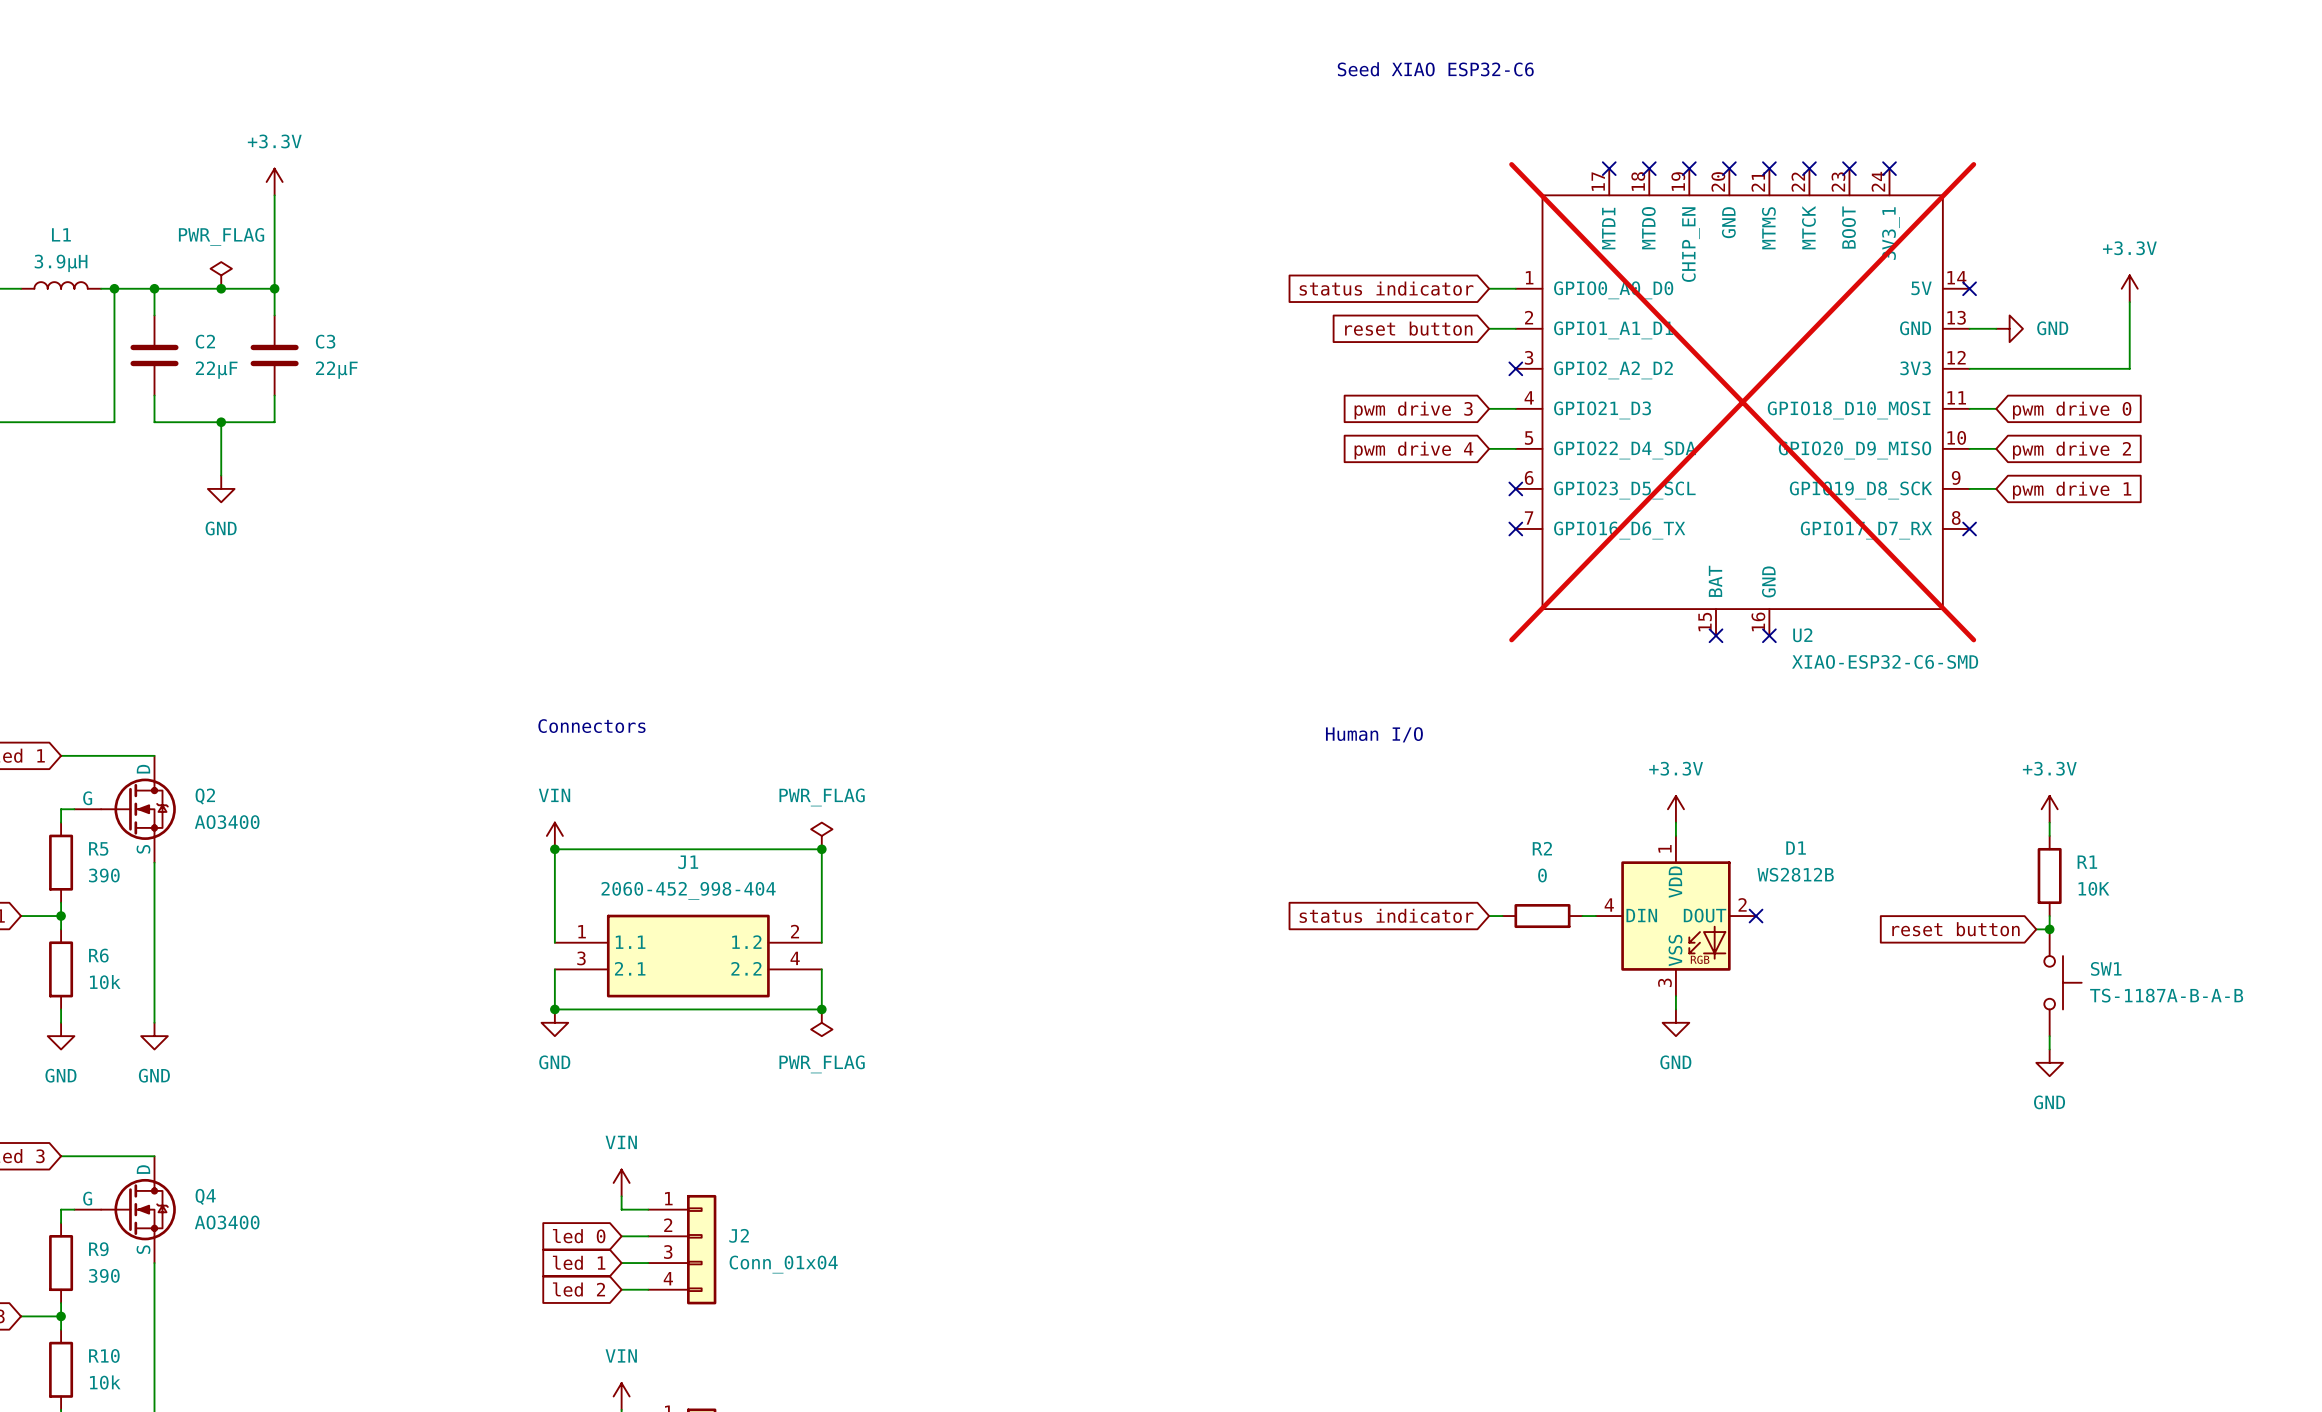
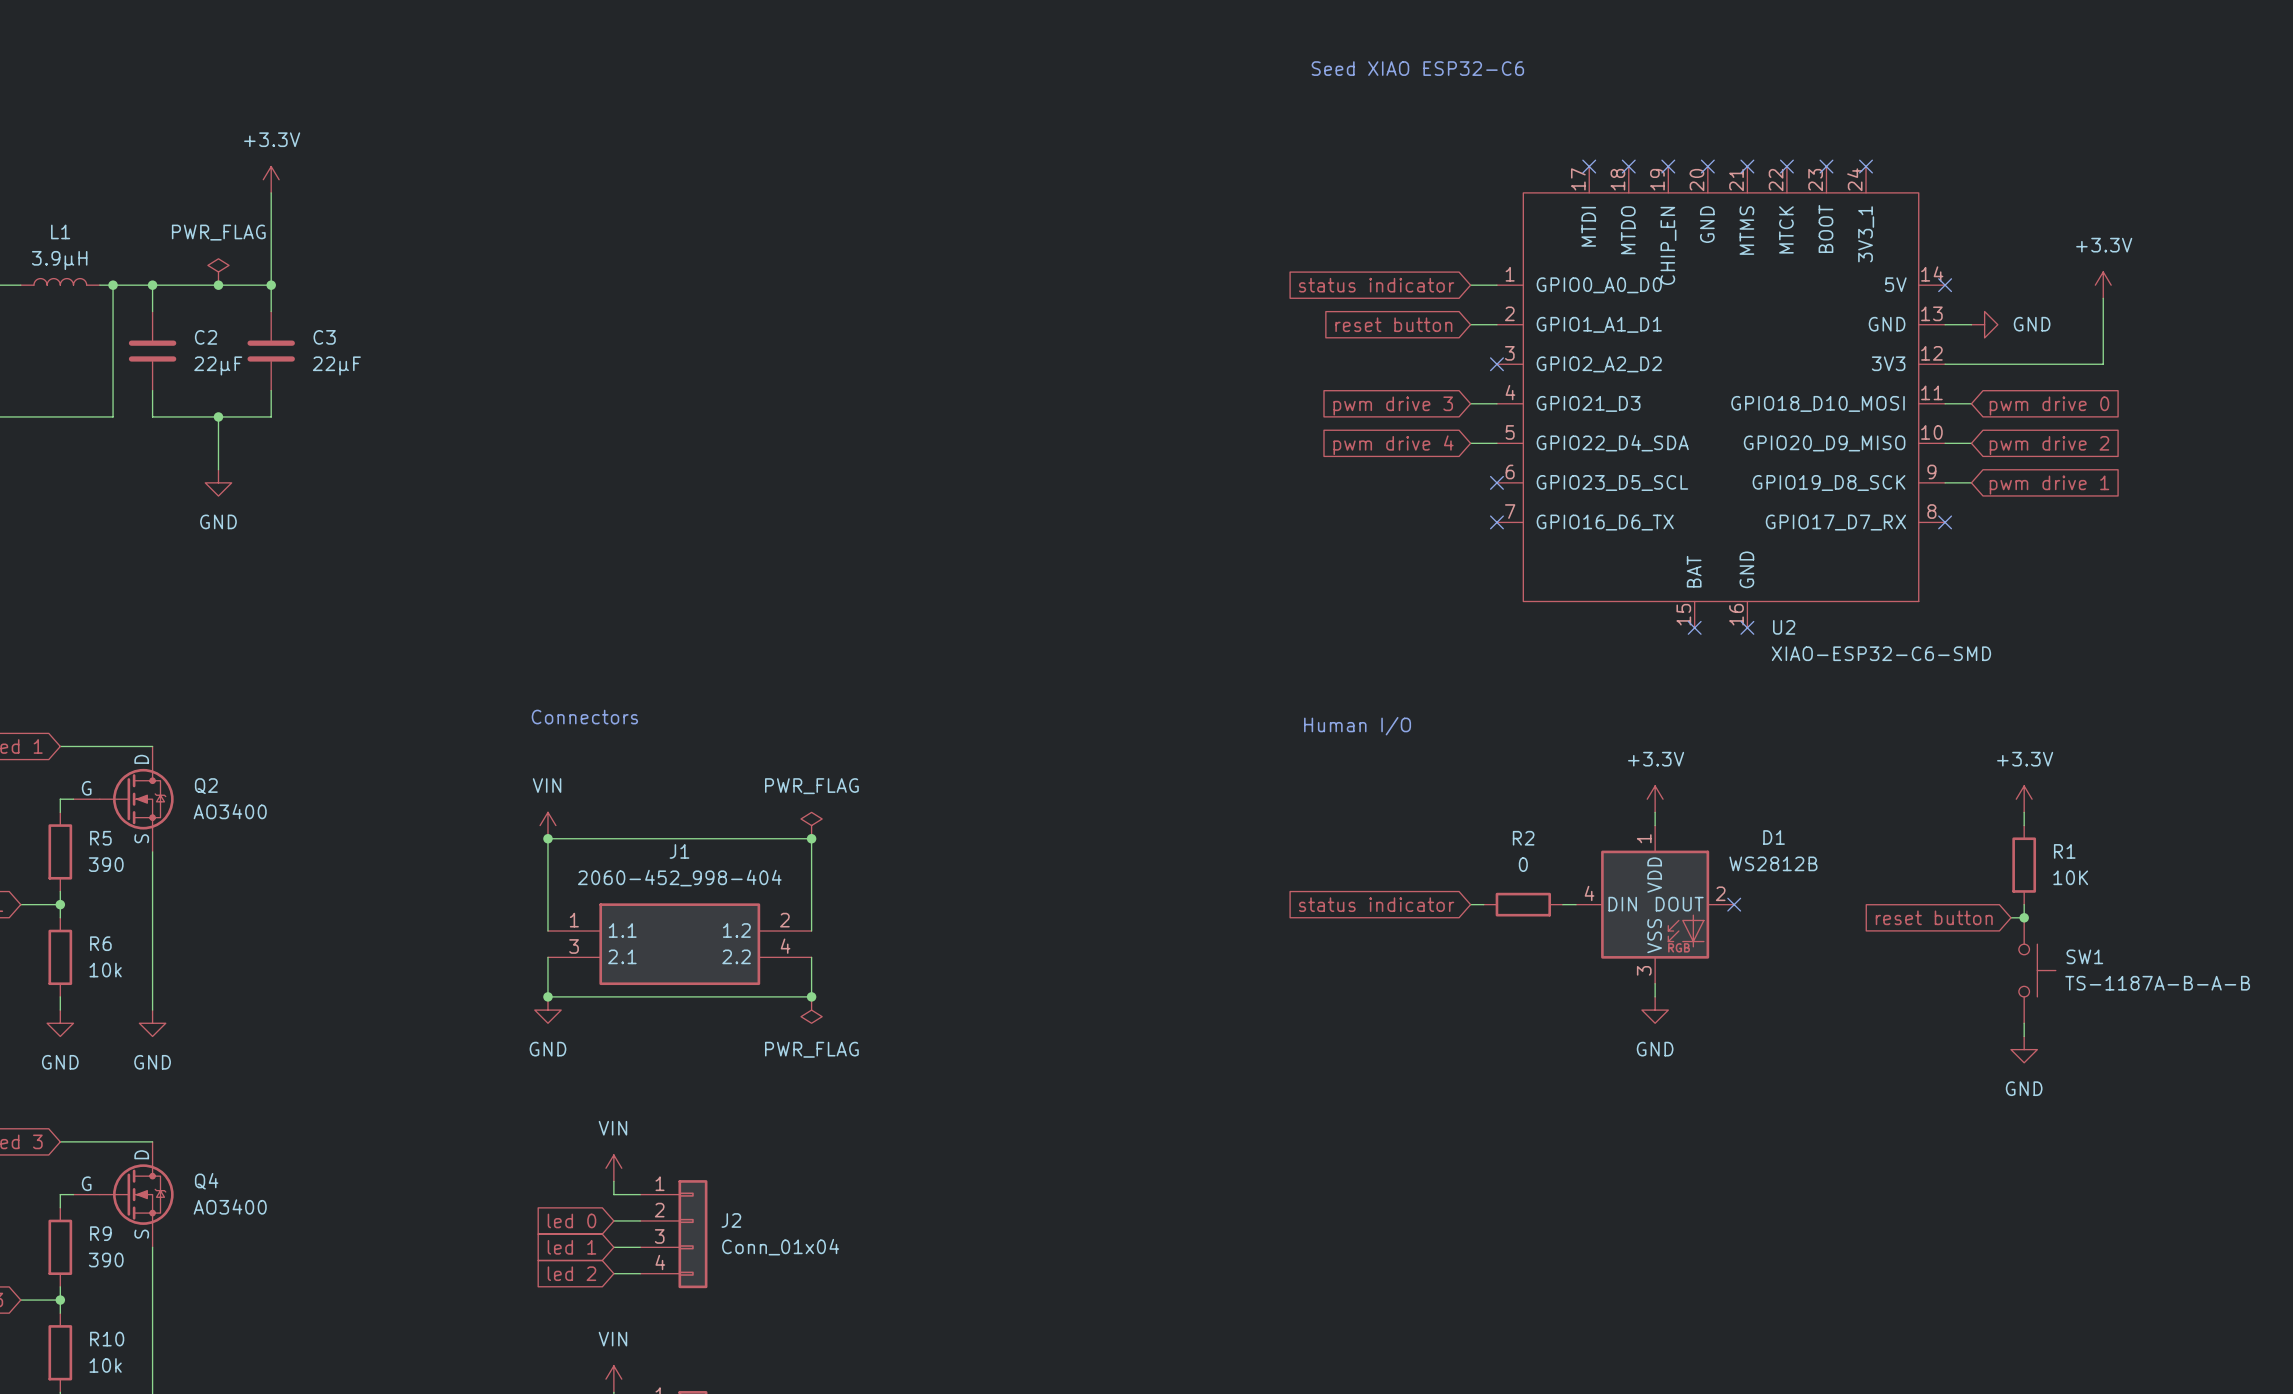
U2 do-not-place cross: (1742, 402) -> none

